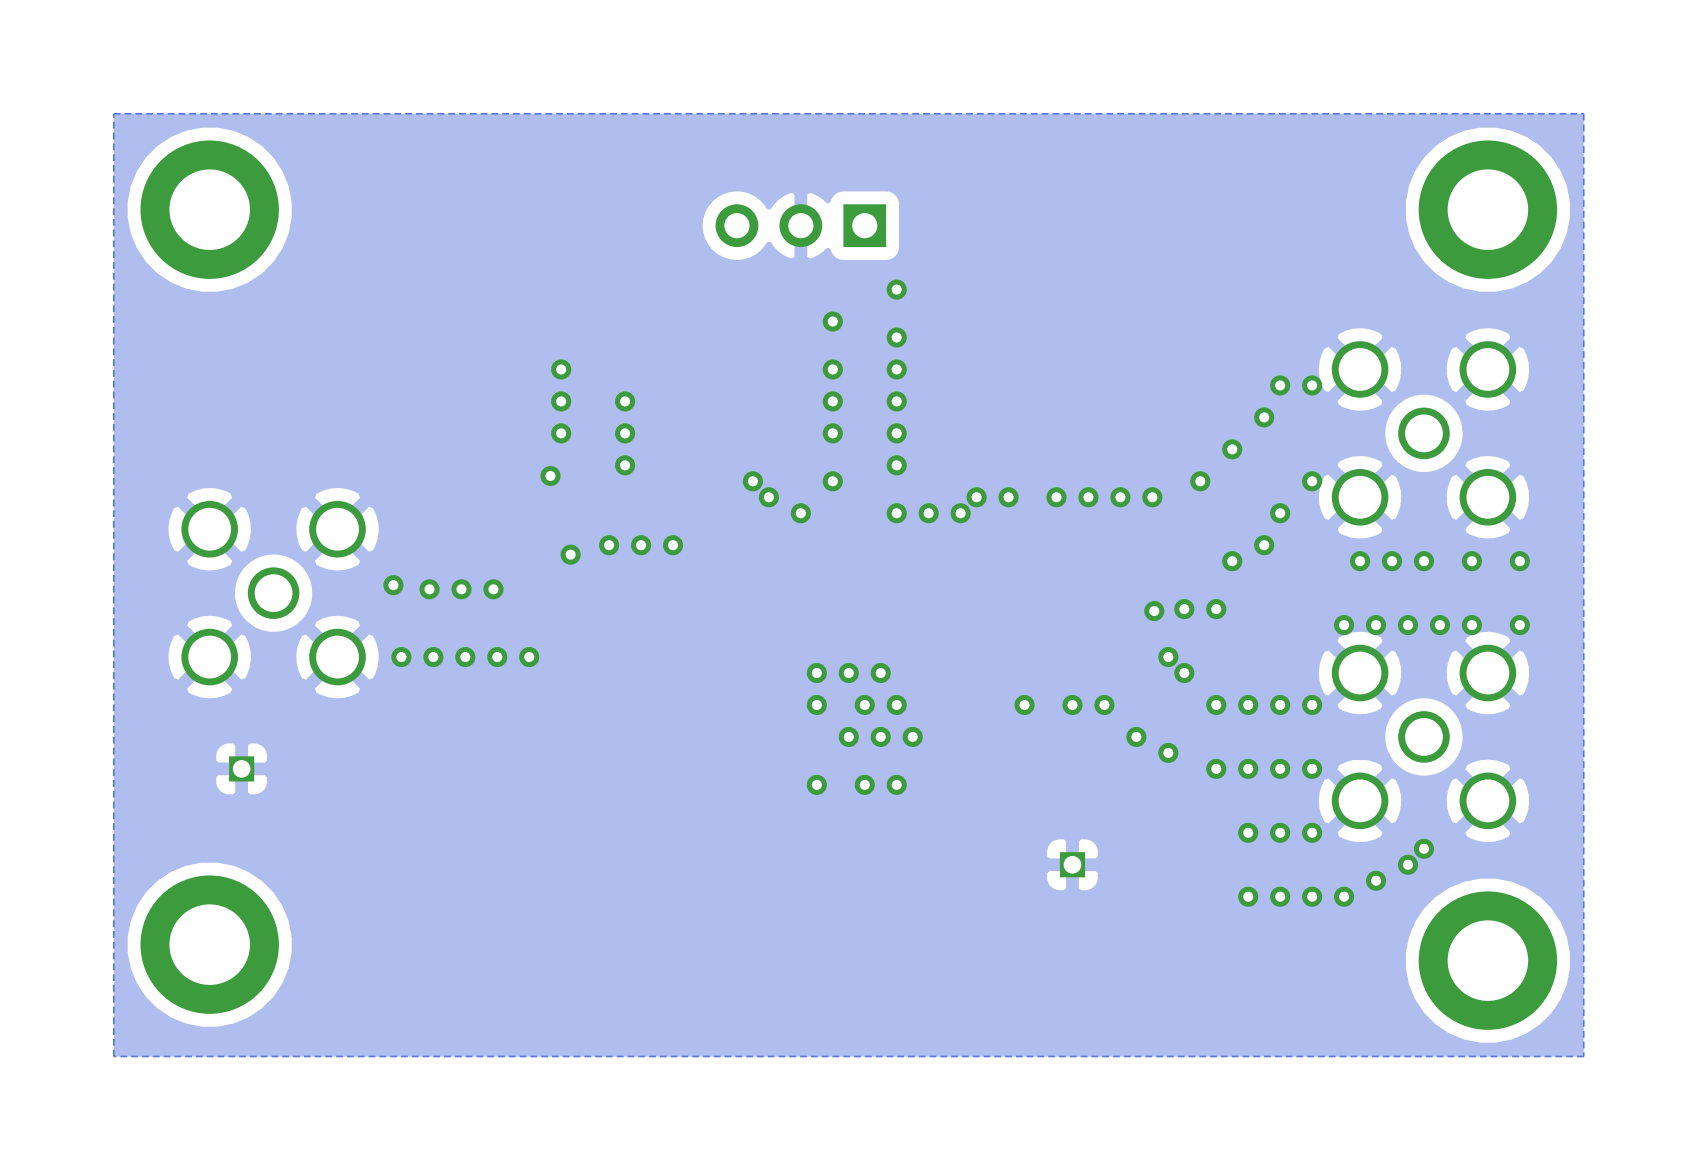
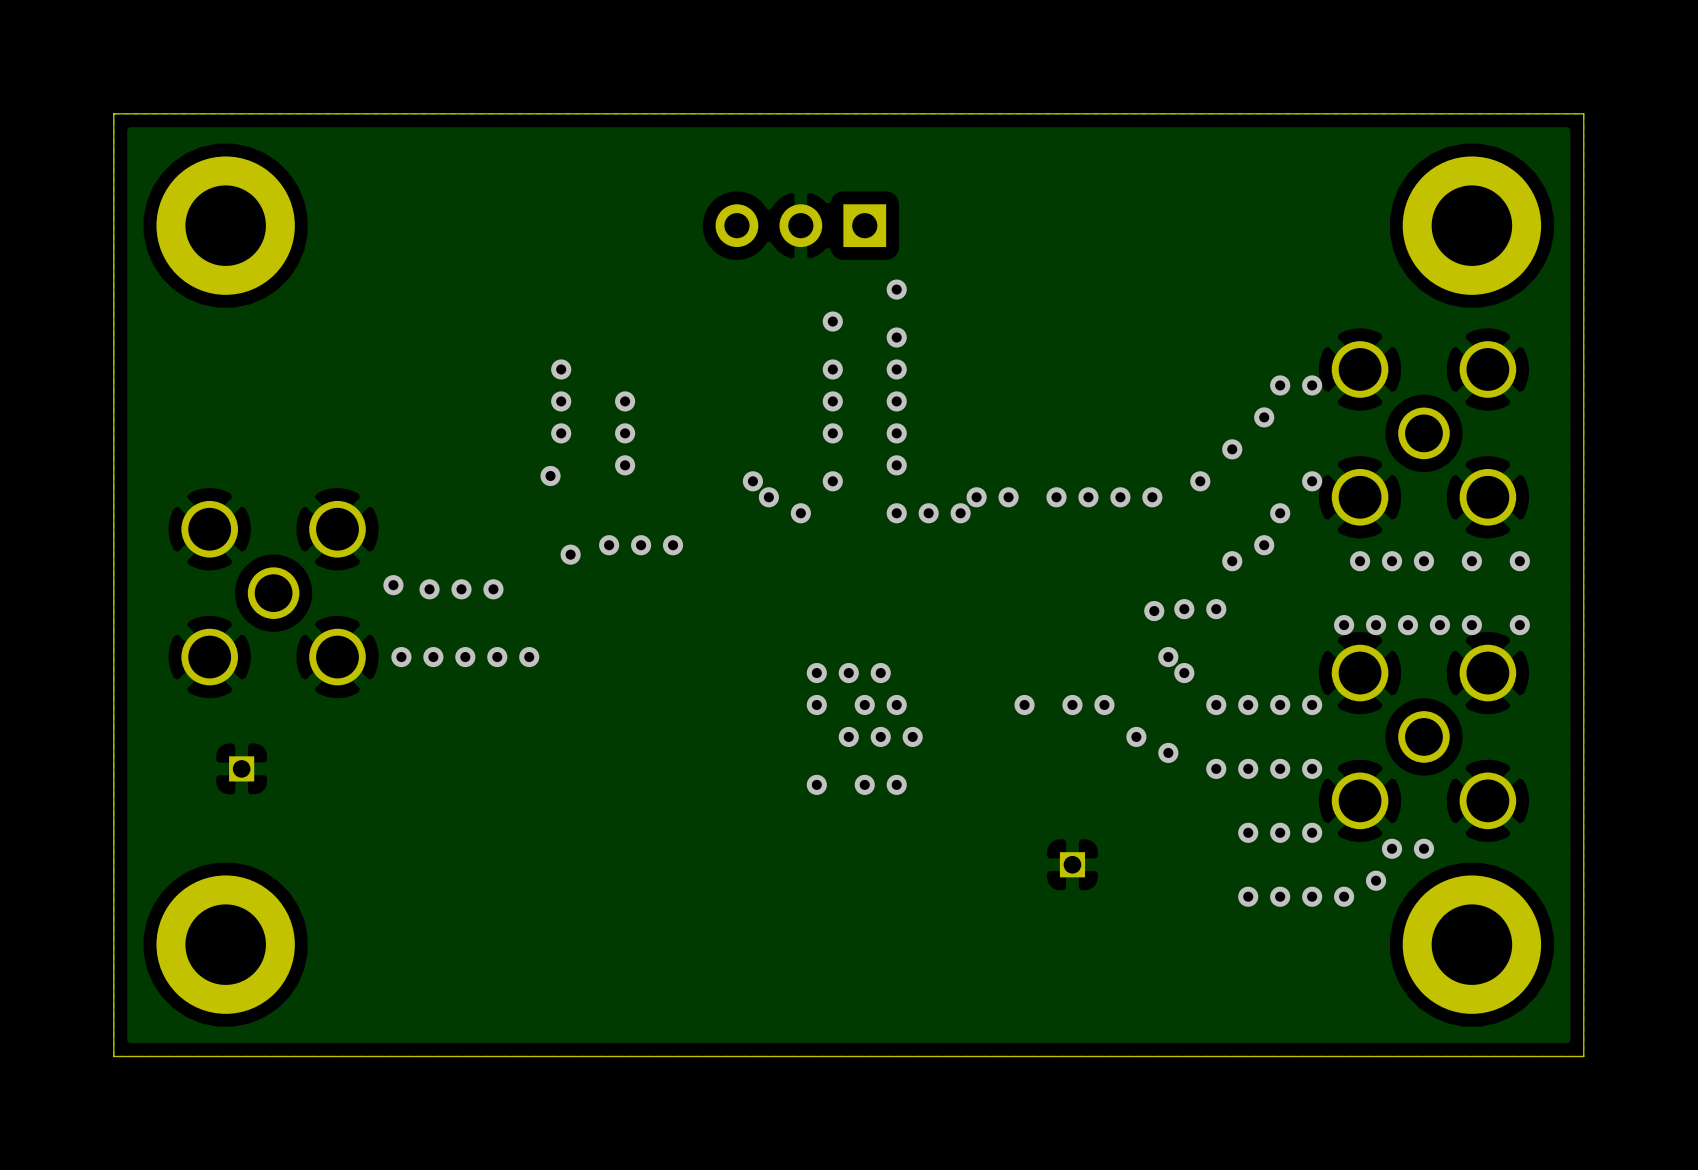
board edge: none -> (1583, 113) (1583, 1056) (113, 1056) (113, 113) (1583, 113)
part position: (209, 209) -> (225, 225)
part position: (1487, 209) -> (1471, 225)
via position: (1408, 864) -> (1392, 848)
part position: (209, 944) -> (225, 944)
part position: (1487, 960) -> (1471, 944)

